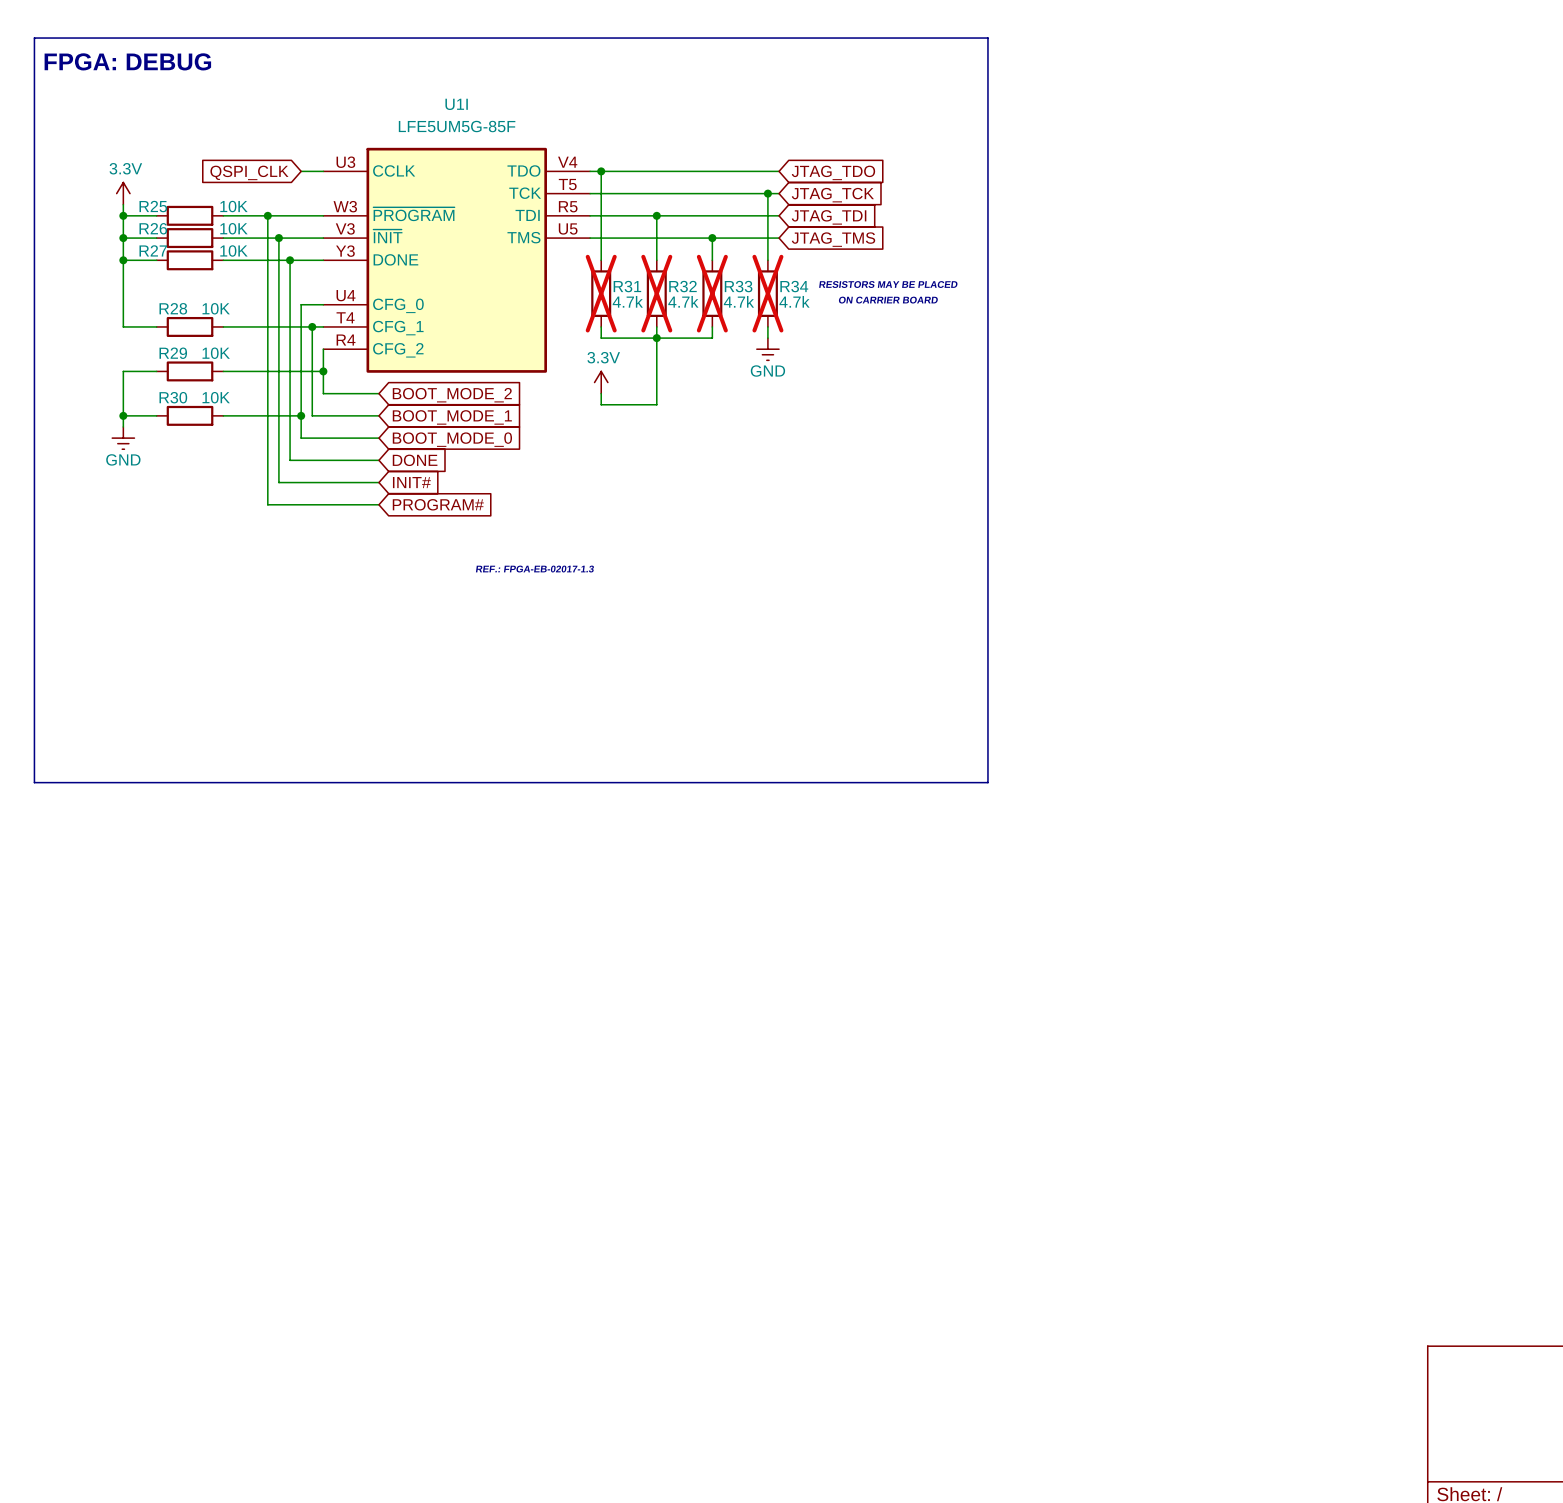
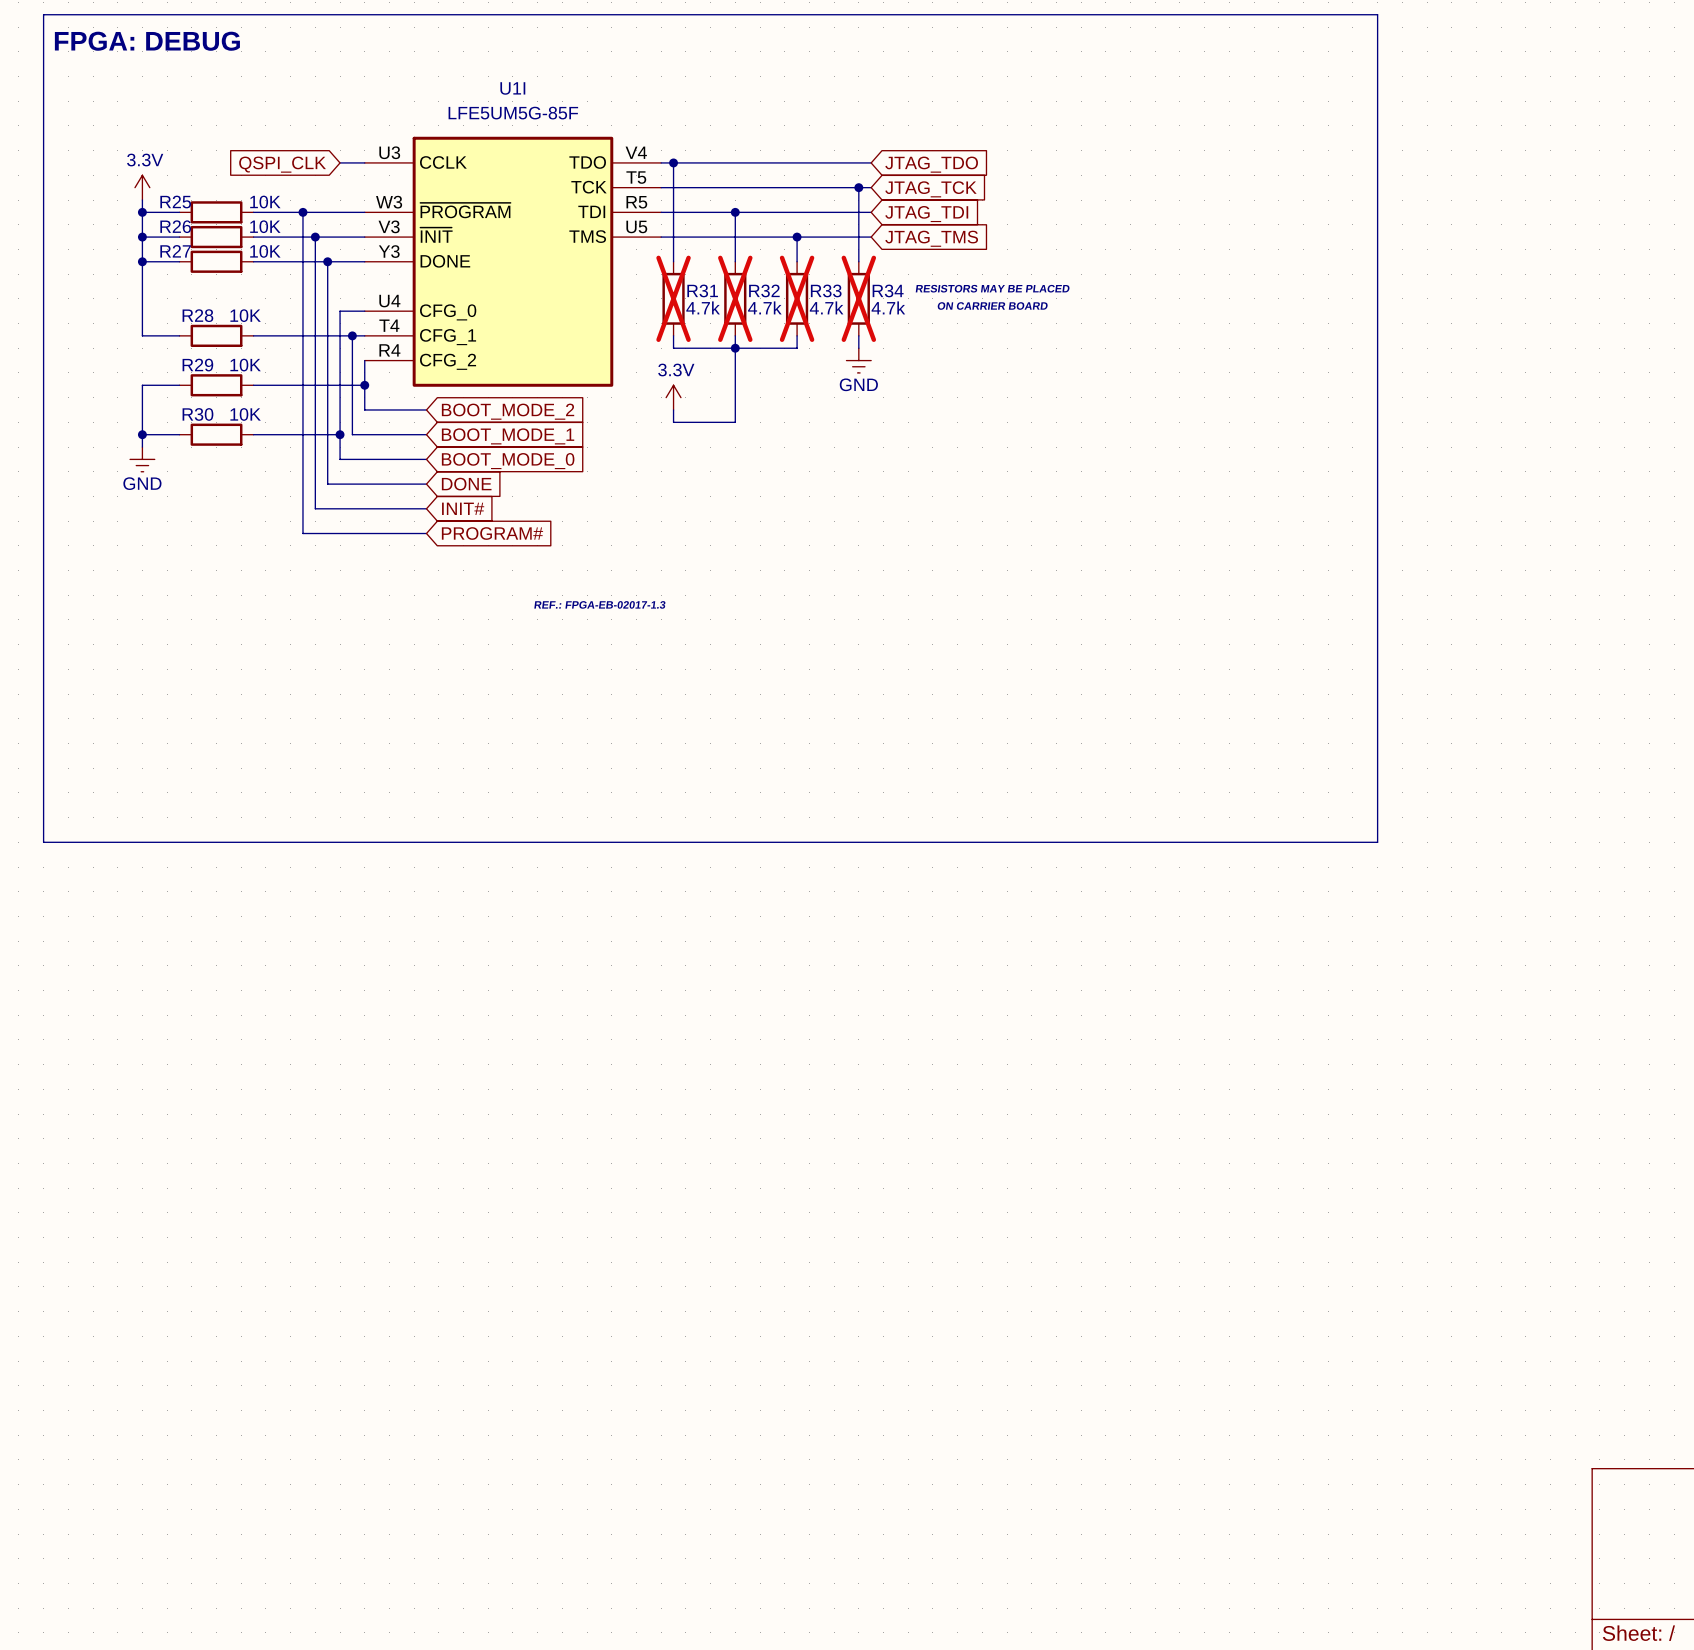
line: (987, 38) (987, 782) -> (1103, 14) (1377, 14) (1377, 842) (1103, 842)

